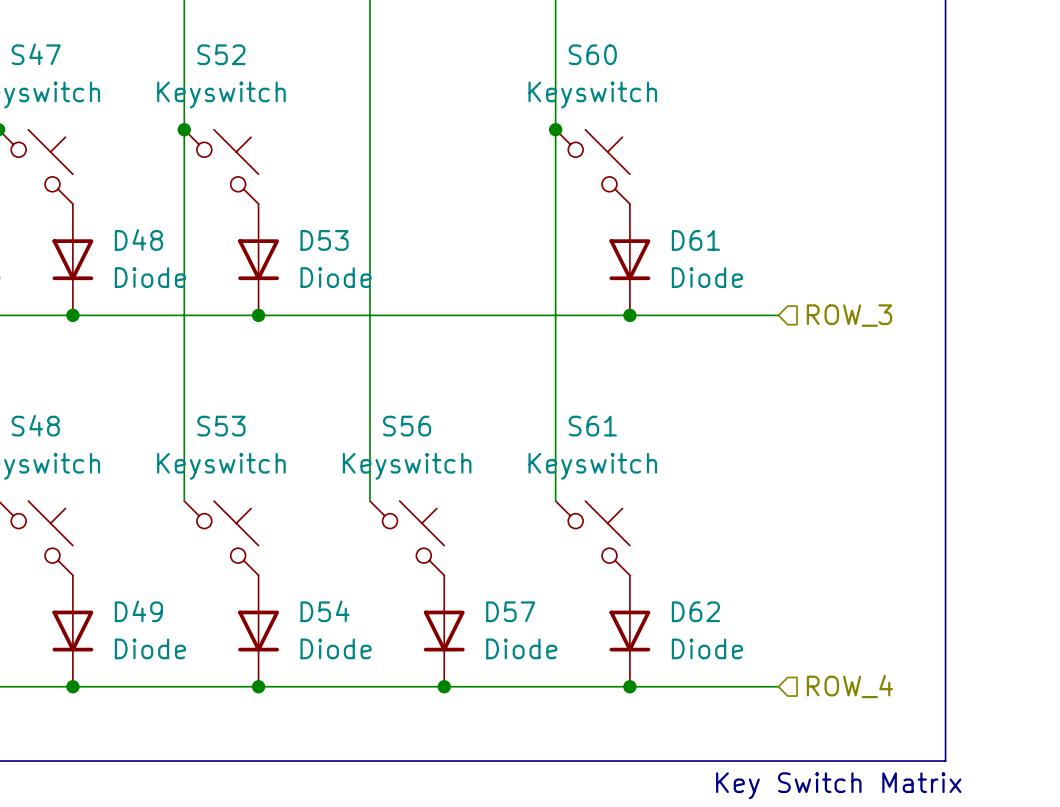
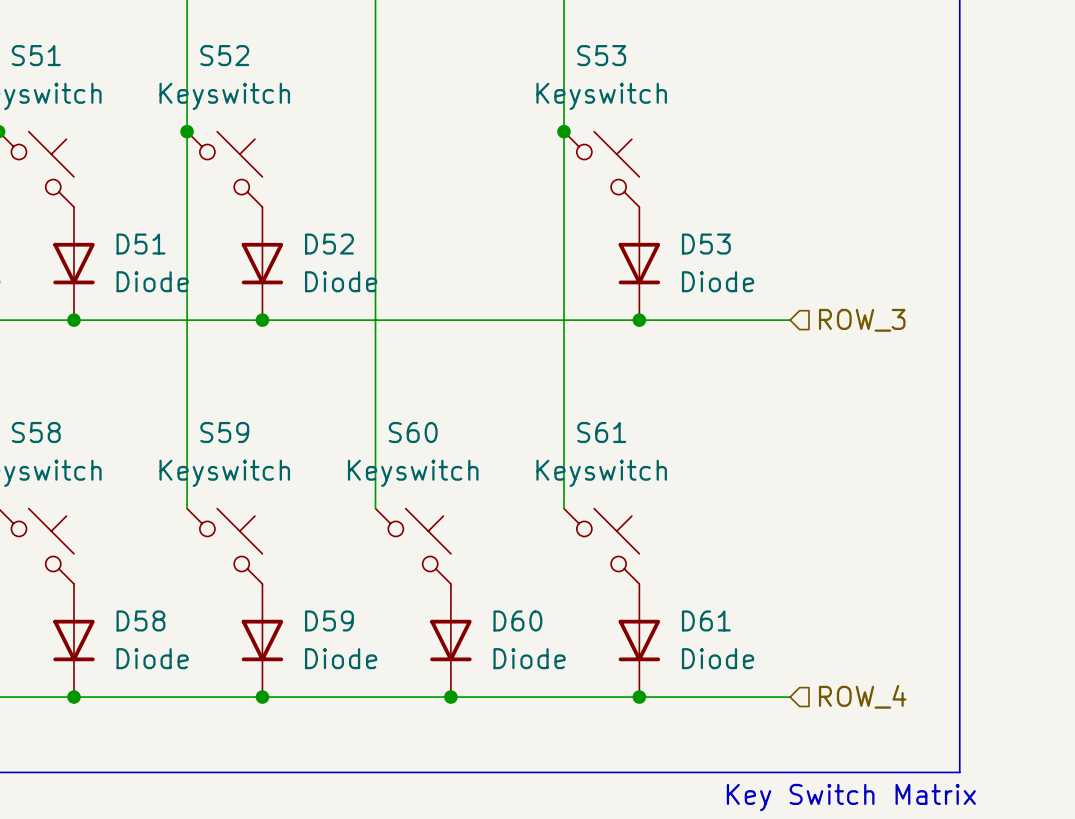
S47 name: S47 (36, 54) -> S51 (36, 55)
S60 name: S60 (592, 54) -> S53 (601, 55)
D48 name: D48 (138, 239) -> D51 (140, 244)
D53 name: D53 (324, 240) -> D52 (329, 244)
D61 name: D61 (695, 240) -> D53 (706, 244)
S48 name: S48 (35, 425) -> S58 (36, 432)
S53 name: S53 (221, 426) -> S59 (224, 432)
S56 name: S56 (407, 426) -> S60 (413, 432)
D49 name: D49 (138, 611) -> D58 (140, 620)
D54 name: D54 (325, 611) -> D59 (329, 620)
D57 name: D57 (510, 611) -> D60 (517, 620)
D62 name: D62 (695, 611) -> D61 (706, 620)

